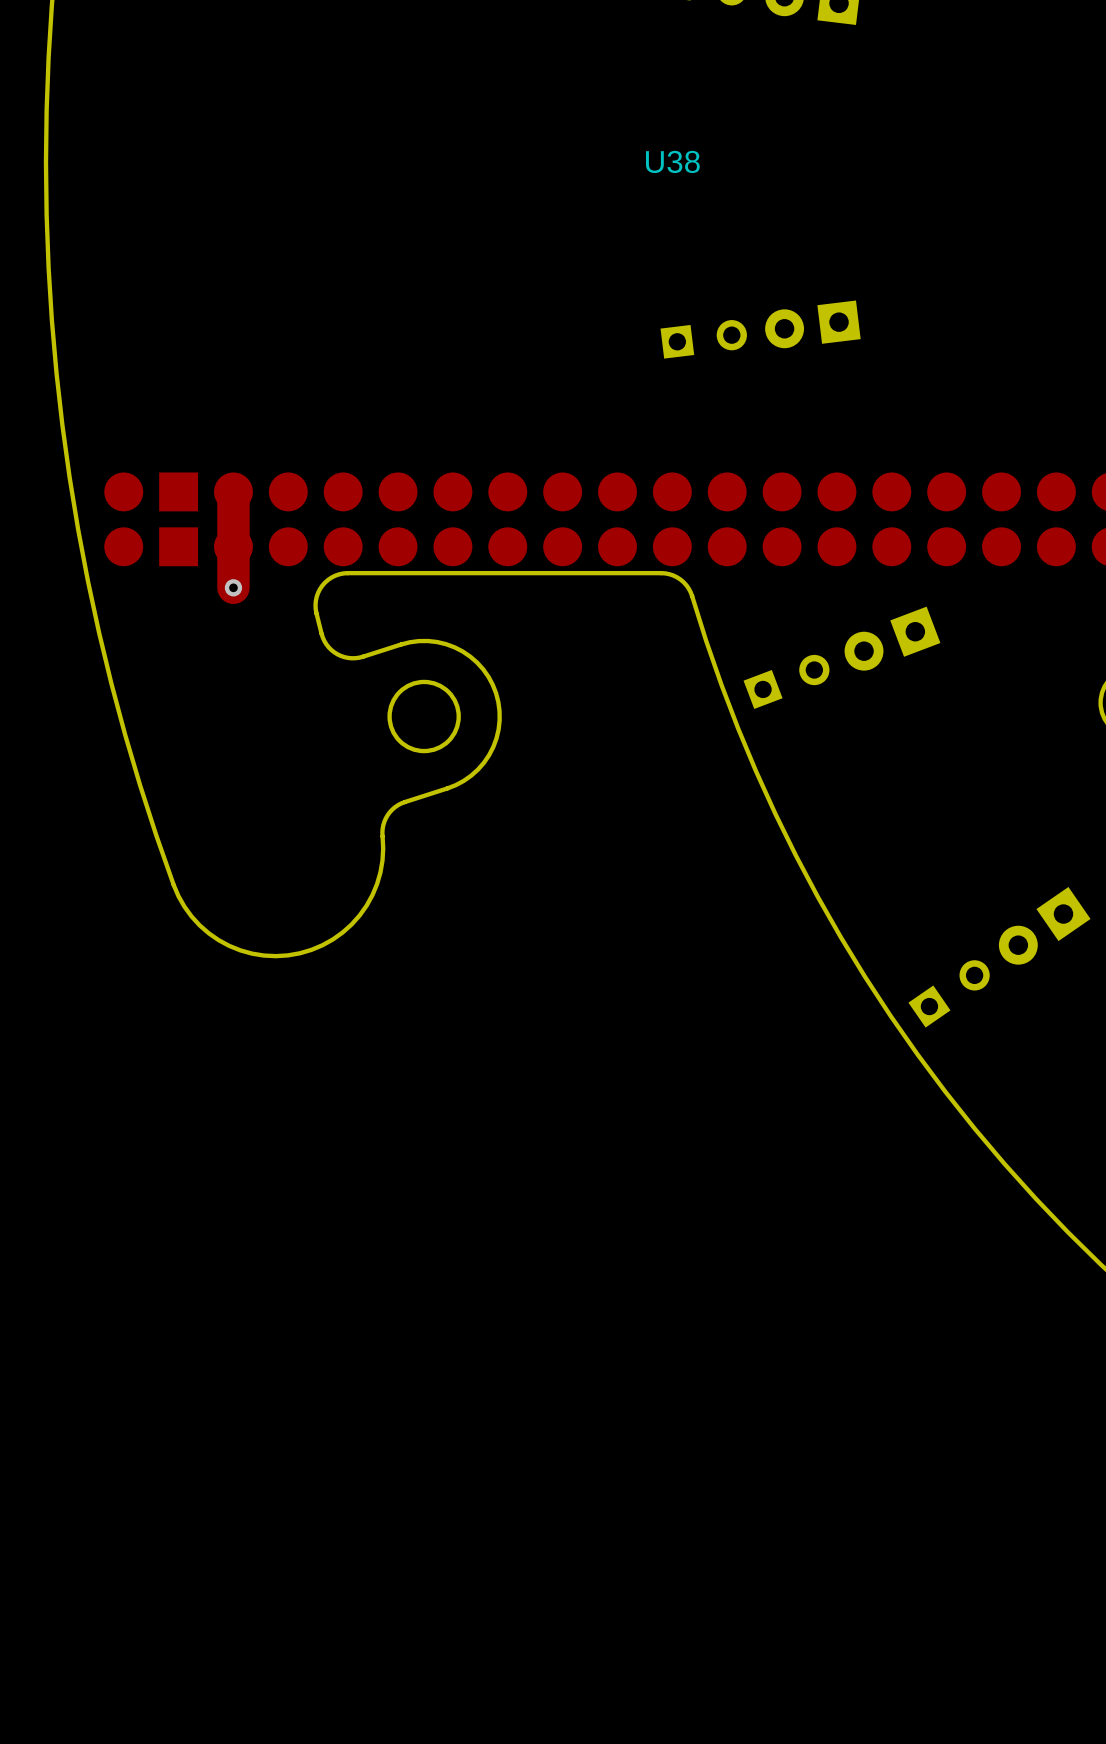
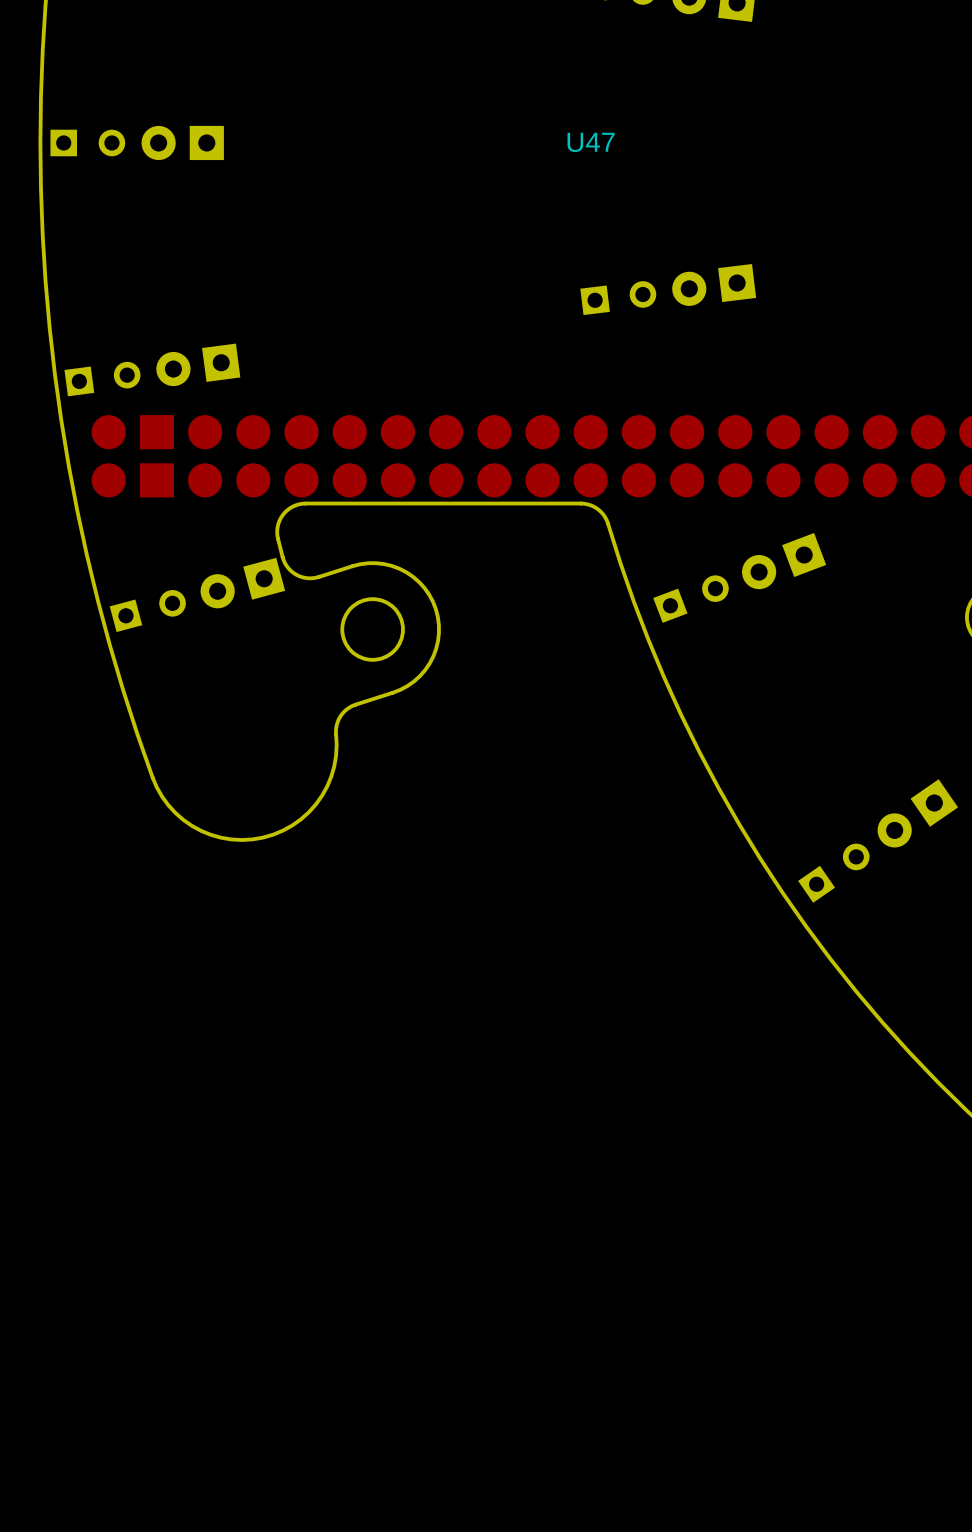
U38 name: U38 (672, 161) -> U47 (591, 142)
part: none -> (87, 142)
part: none -> (182, 142)
part: none -> (198, 364)
part: none -> (102, 379)
track: (233, 491) (233, 587) -> none
via: (233, 587) -> none
part: none -> (242, 583)
part: none -> (147, 611)

